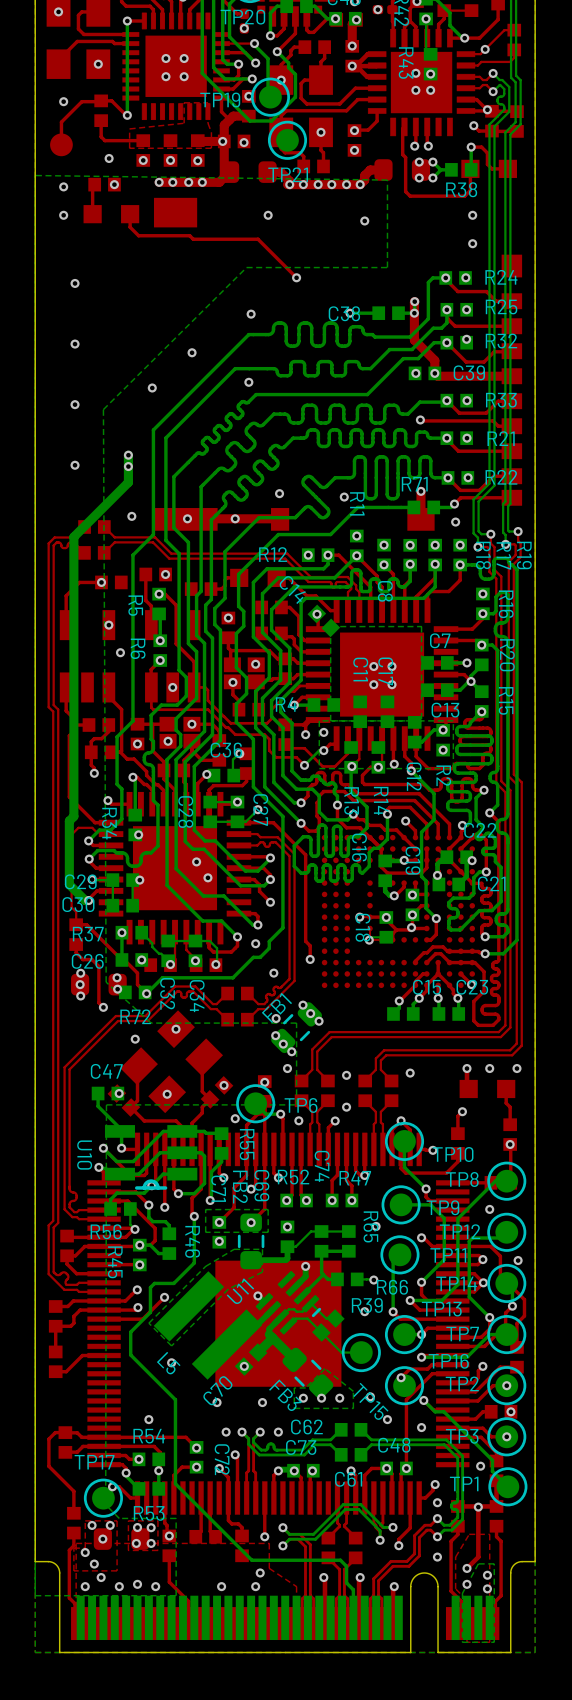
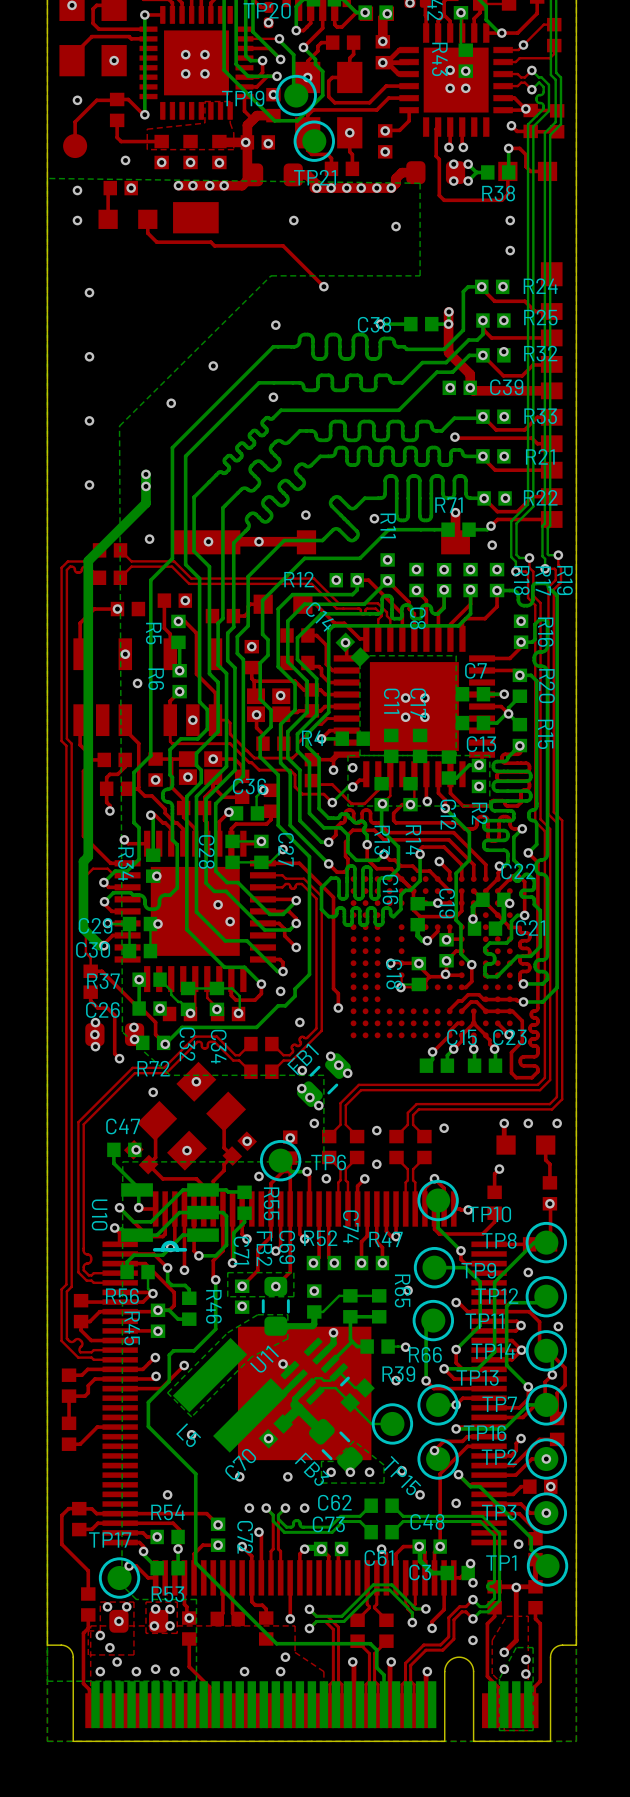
bottom track: none -> (419, 1546) (420, 1561) (432, 1573) (447, 1573)
C3: none -> (457, 1573)

